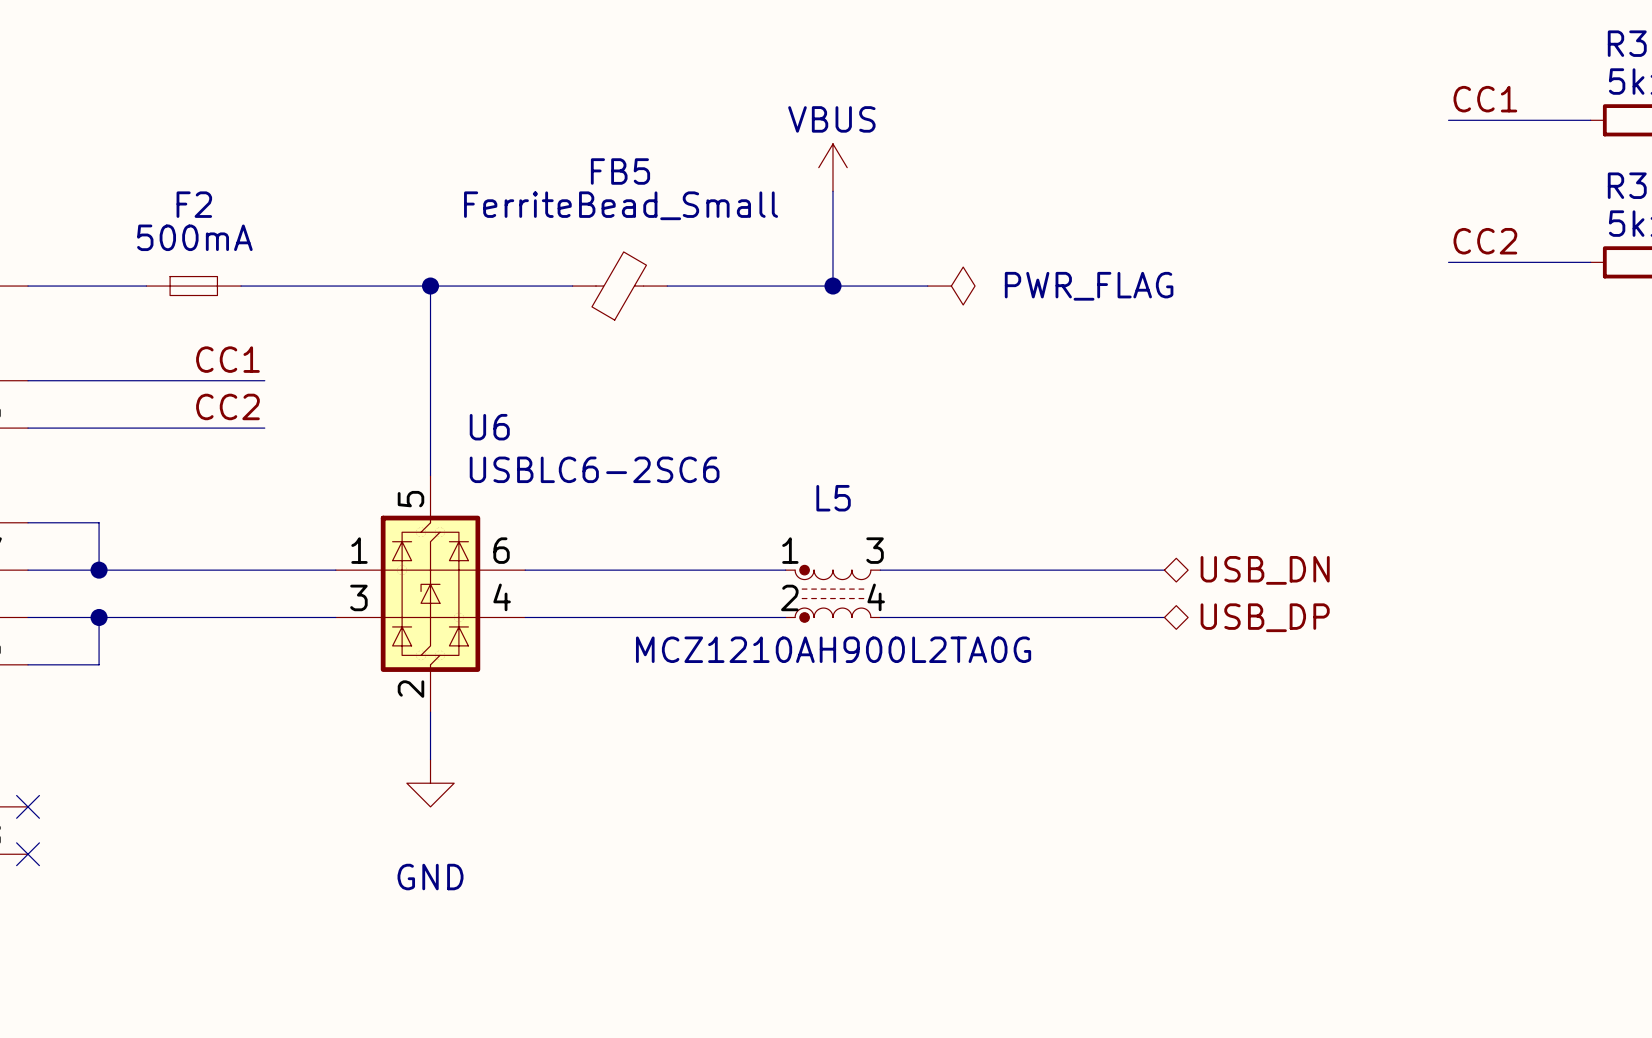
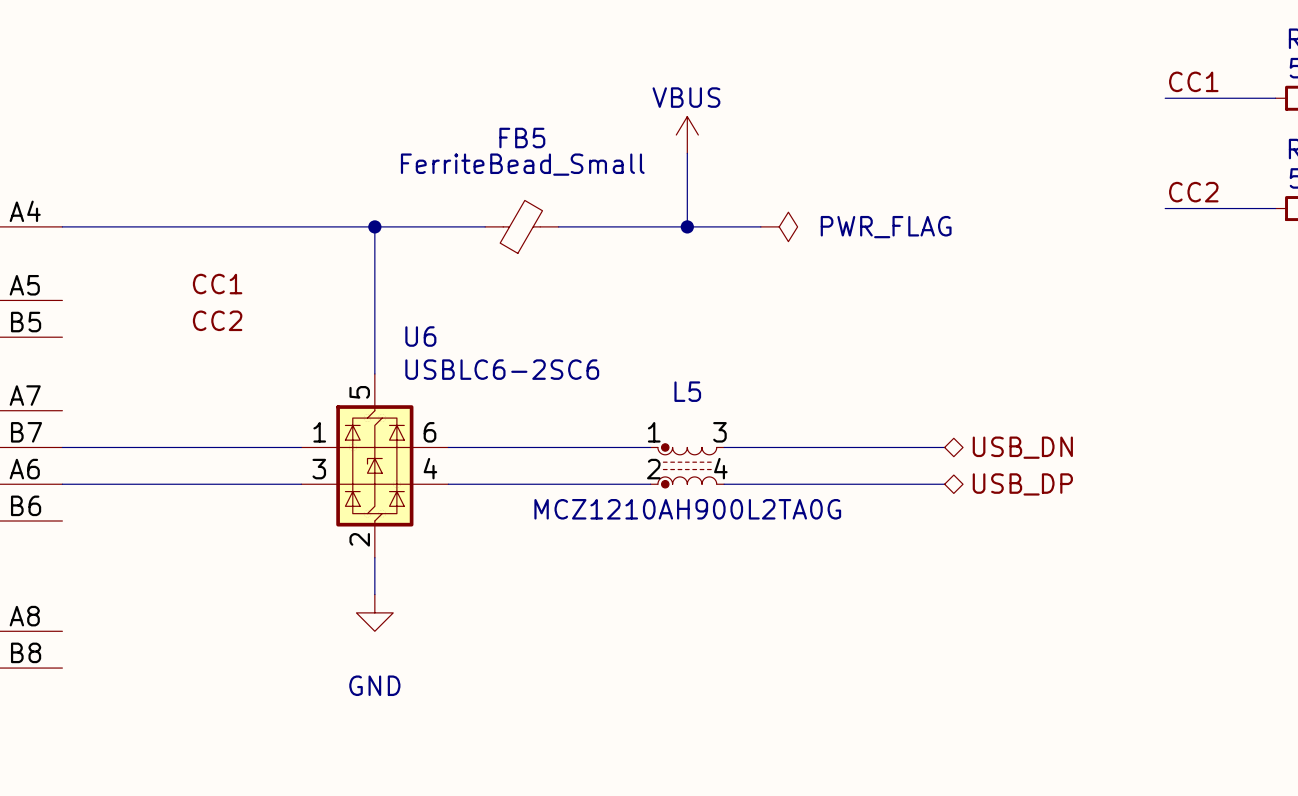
F2: 500mA (193, 286) -> none
wire: (28, 380) (264, 380) -> none
wire: (28, 428) (264, 428) -> none
wire: (28, 522) (99, 522) (99, 570) -> none
junction: (99, 570) -> none
wire: (99, 617) (99, 664) (28, 664) -> none
junction: (99, 617) -> none
no-connect mark: (28, 806) -> none
no-connect mark: (28, 854) -> none

